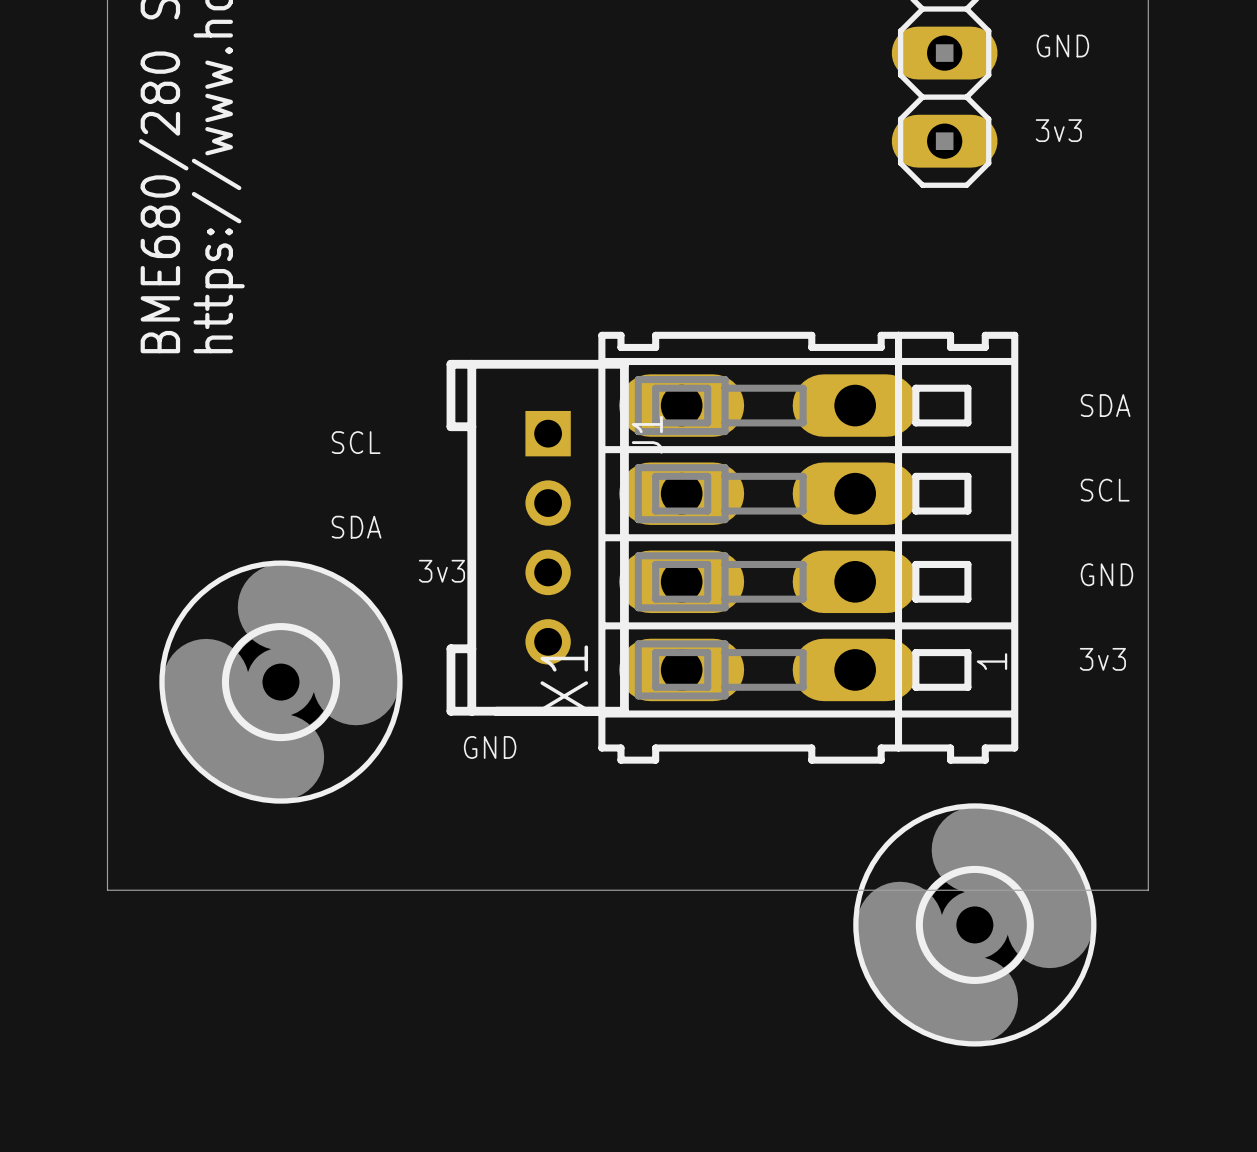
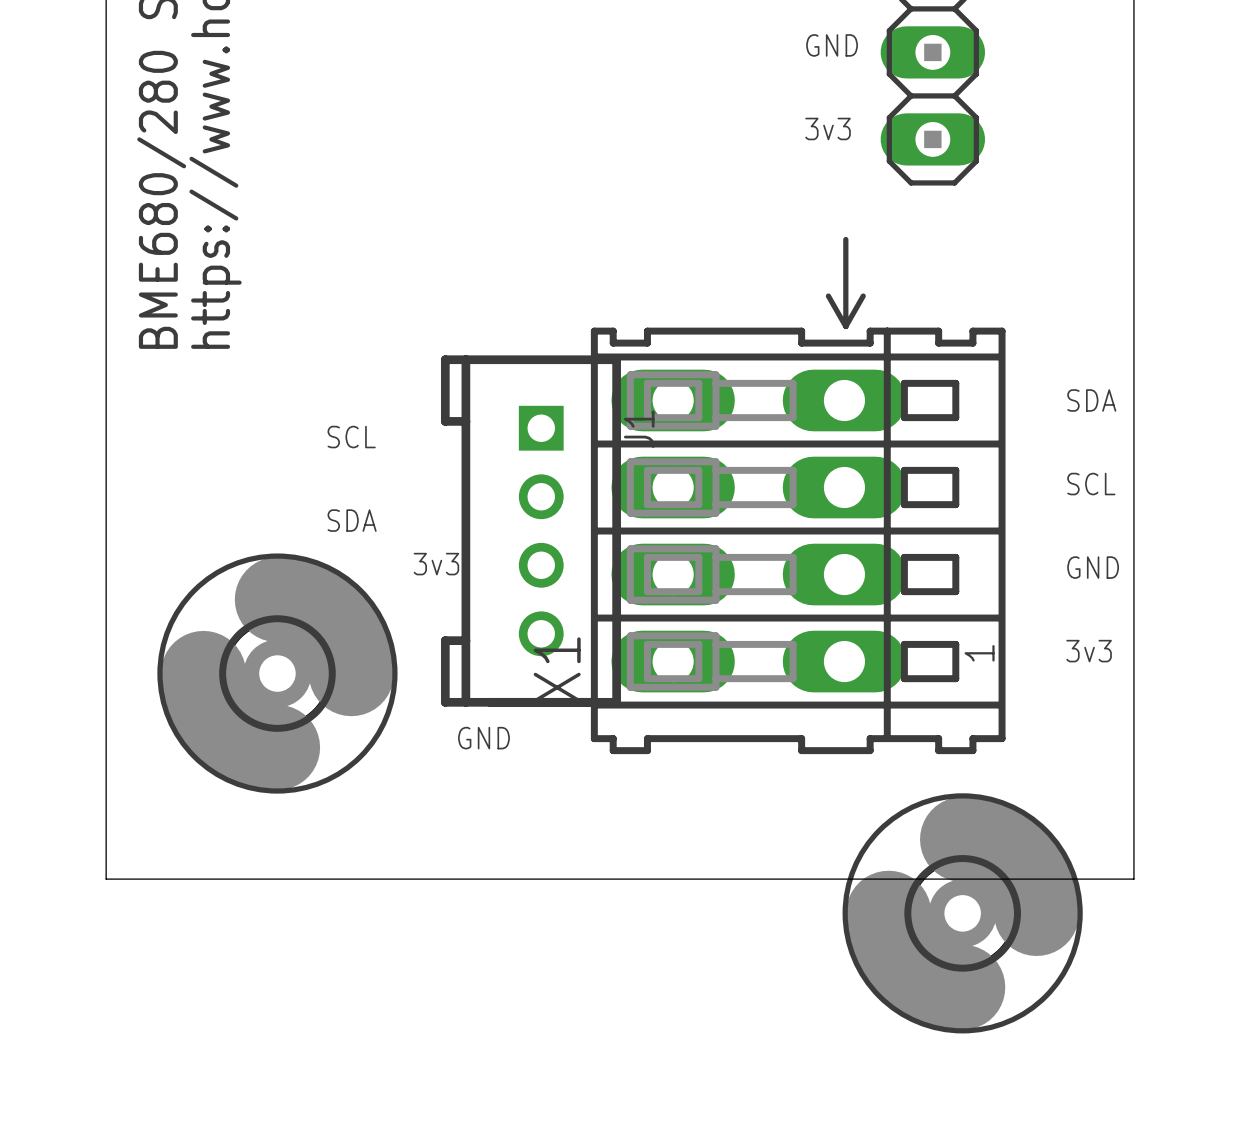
text position: GND (1062, 46) -> GND (832, 45)
text position: 3v3 (1058, 130) -> 3v3 (828, 128)
line: none -> (845, 239) (845, 326)
line: none -> (828, 296) (845, 326)
line: none -> (863, 296) (845, 326)

